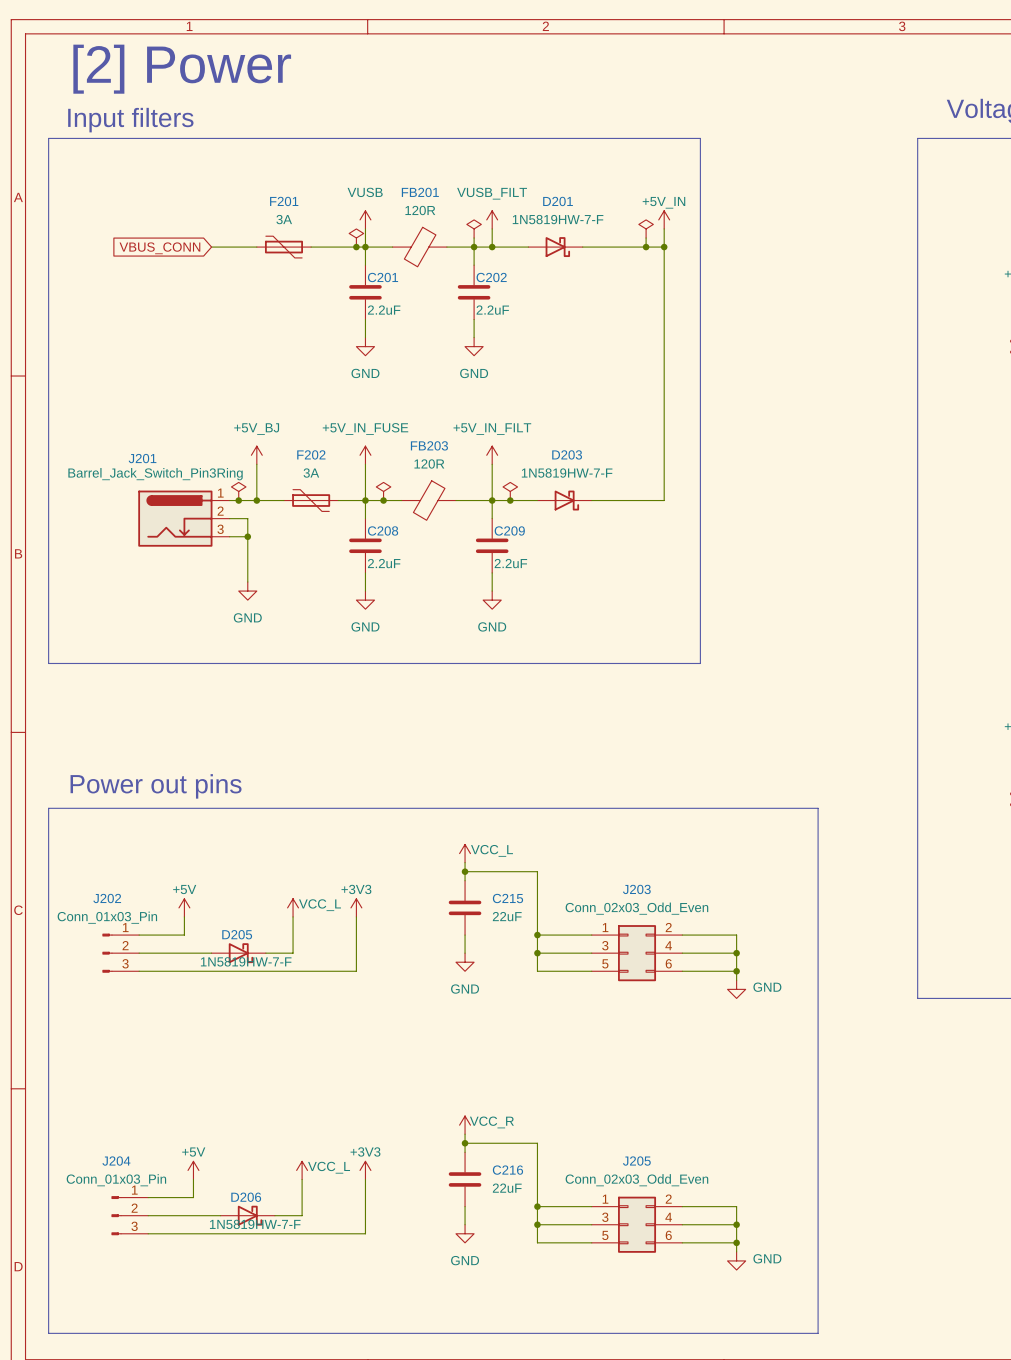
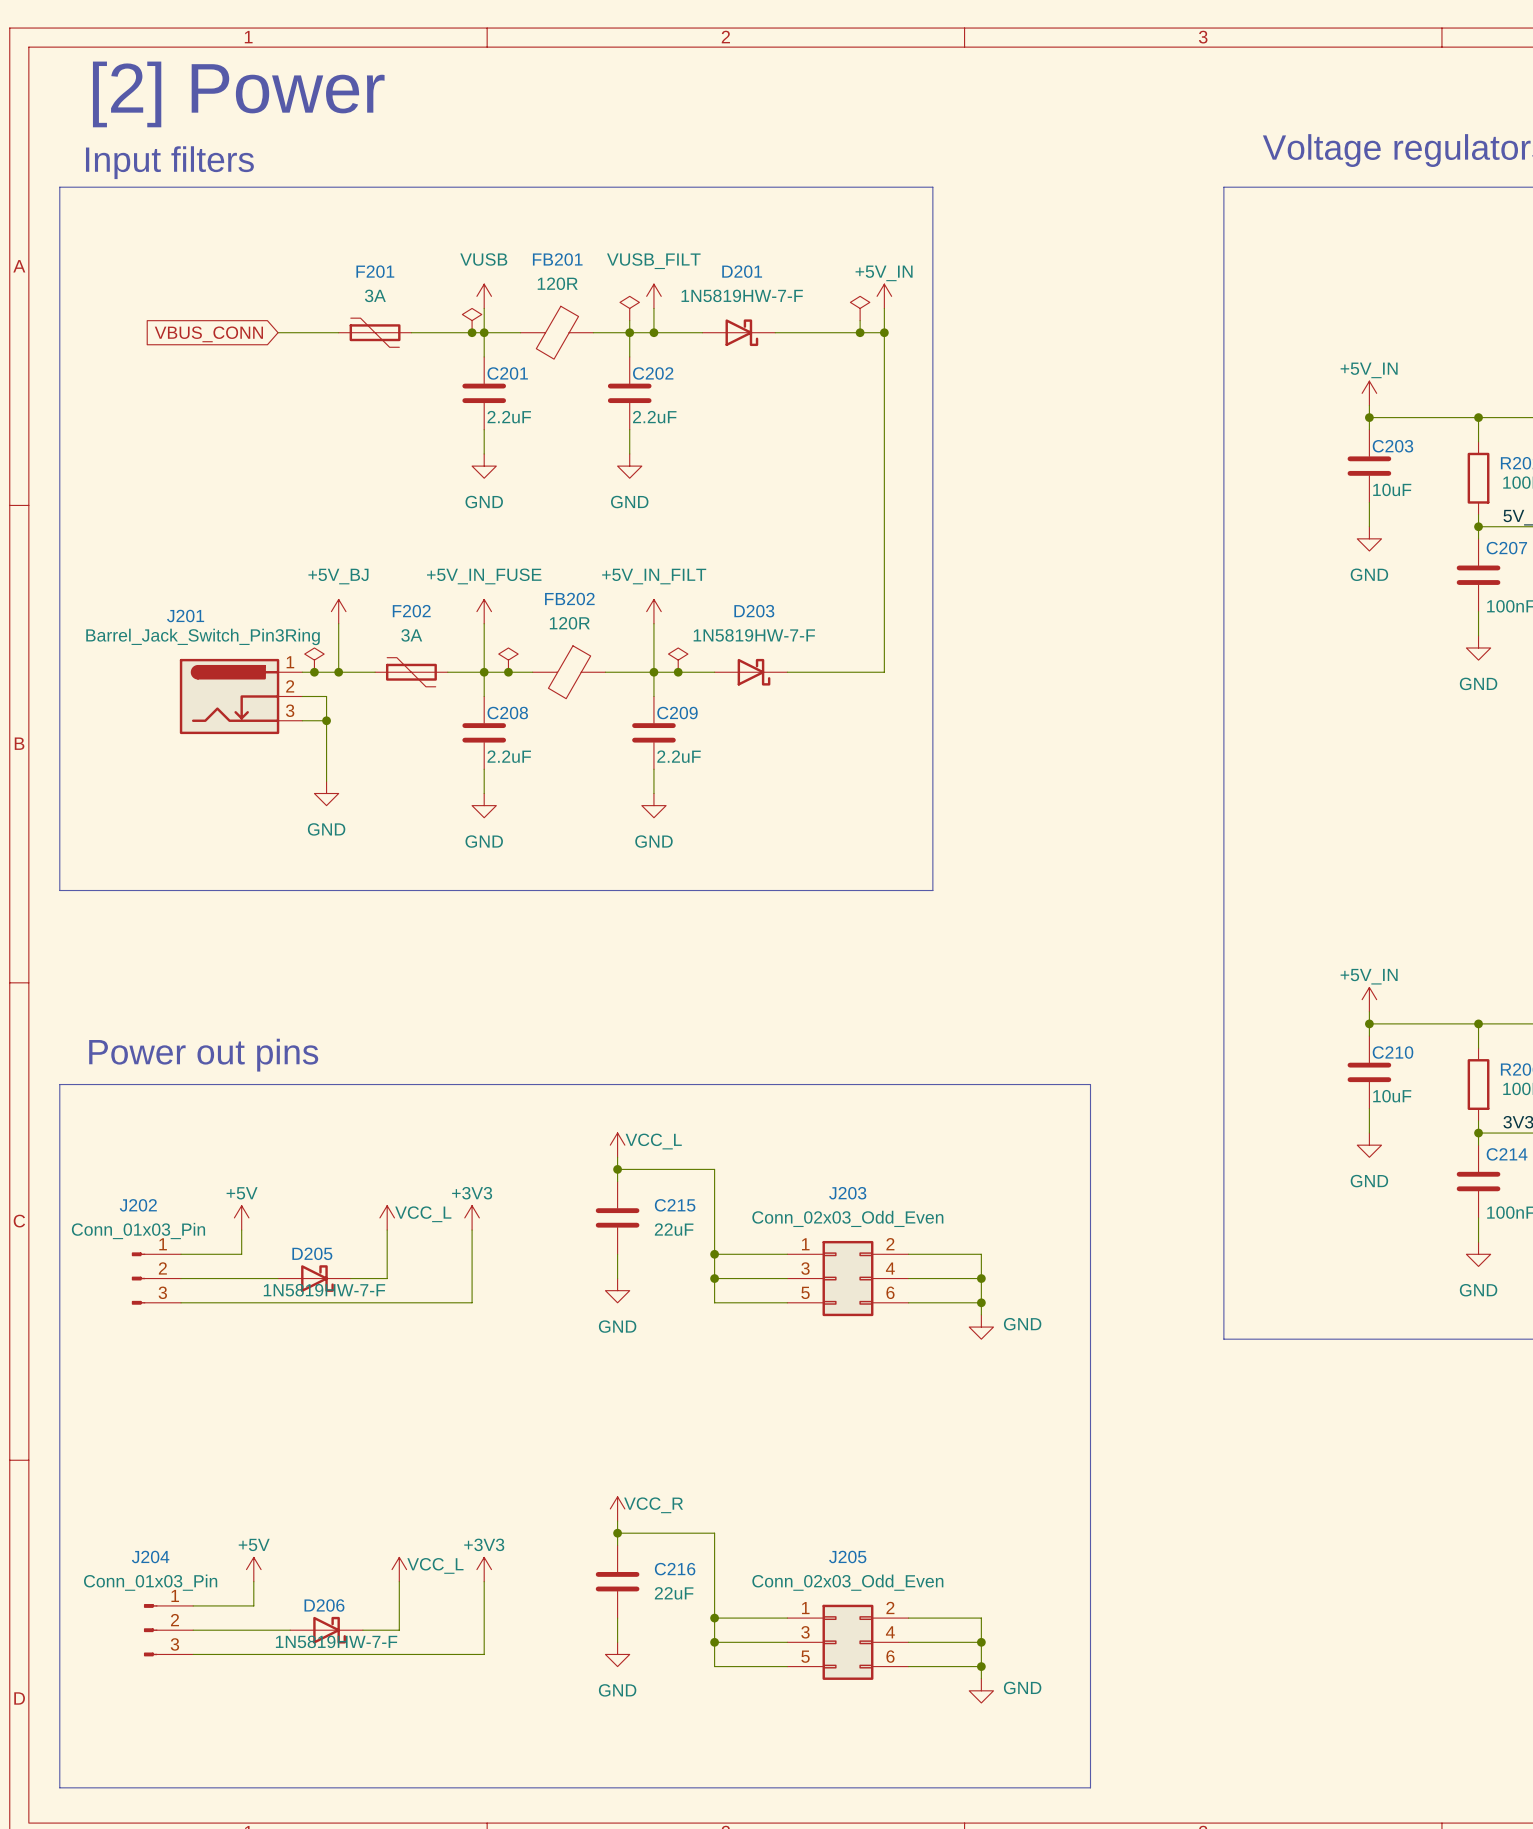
FB203 name: FB203 (429, 445) -> FB202 (569, 599)

